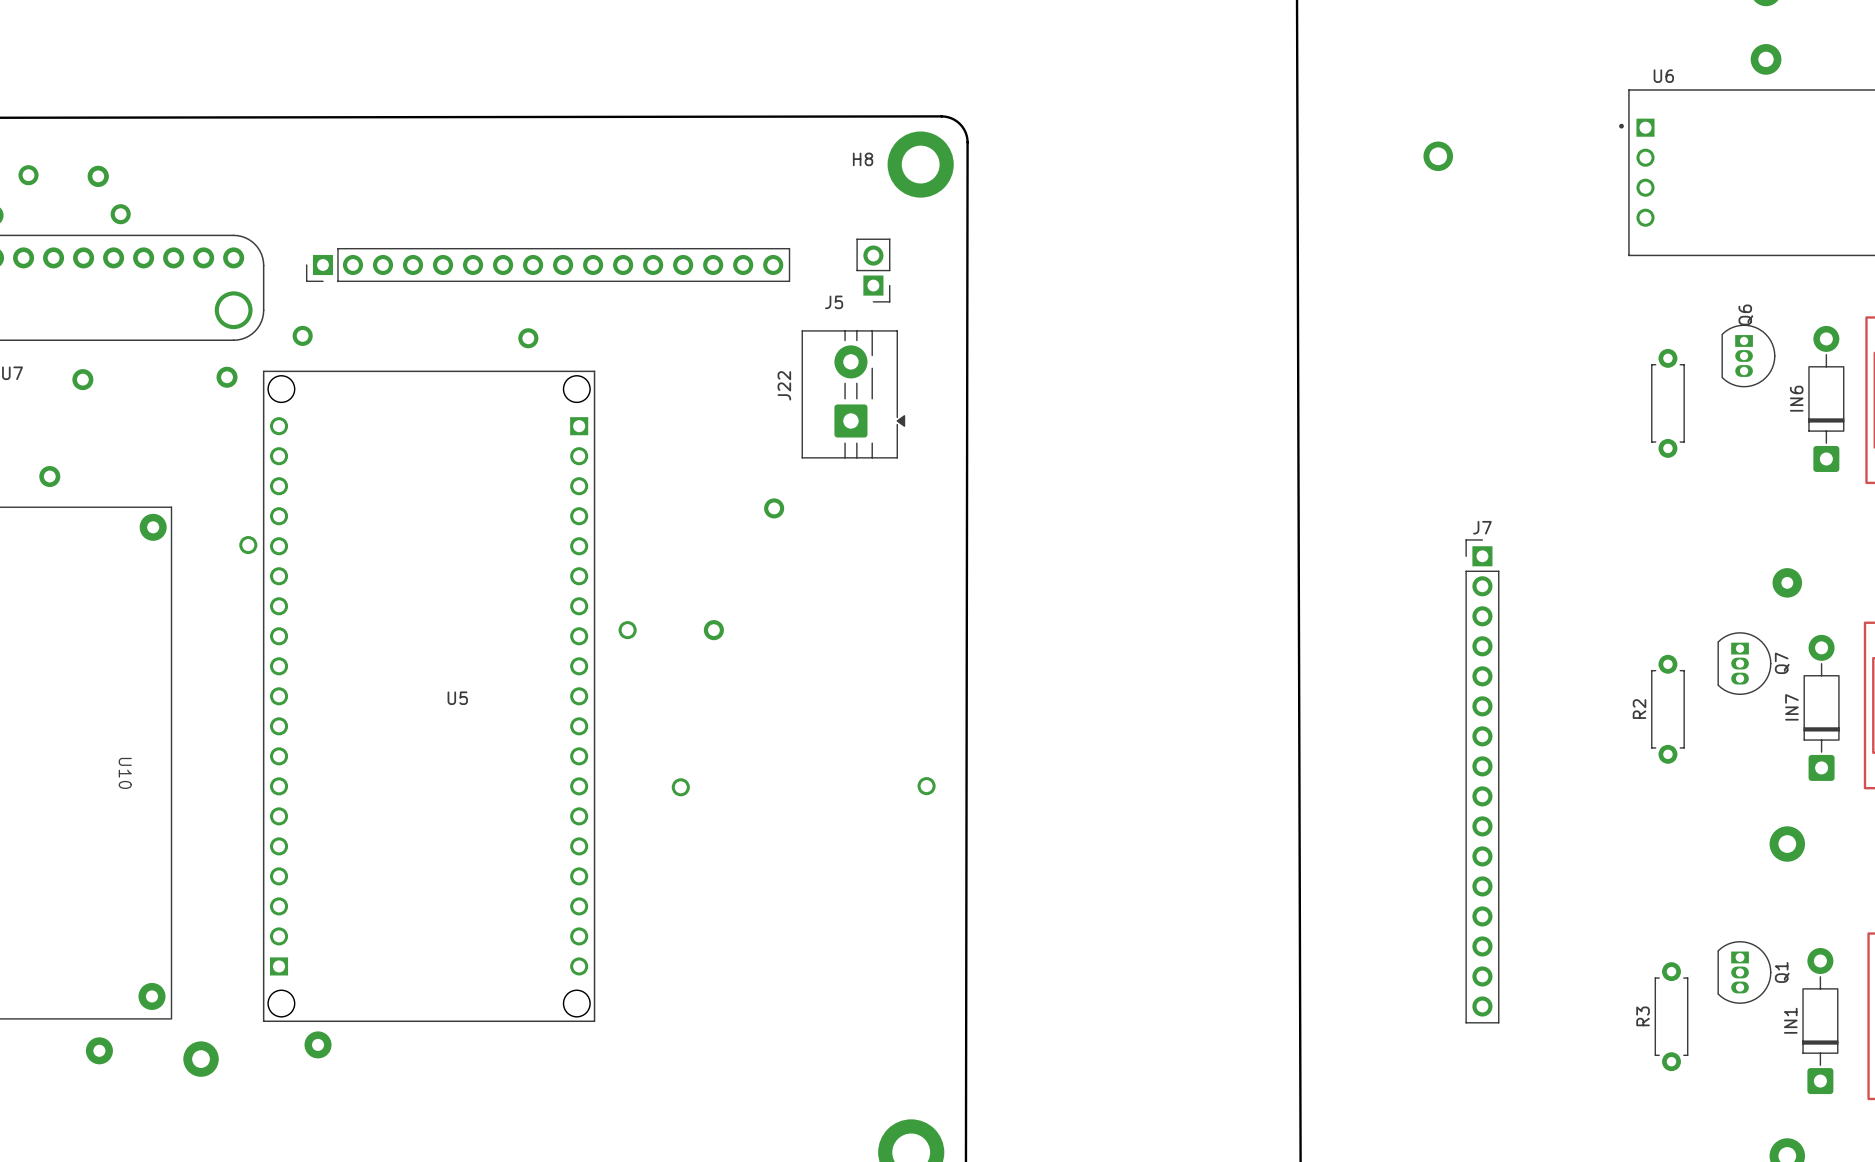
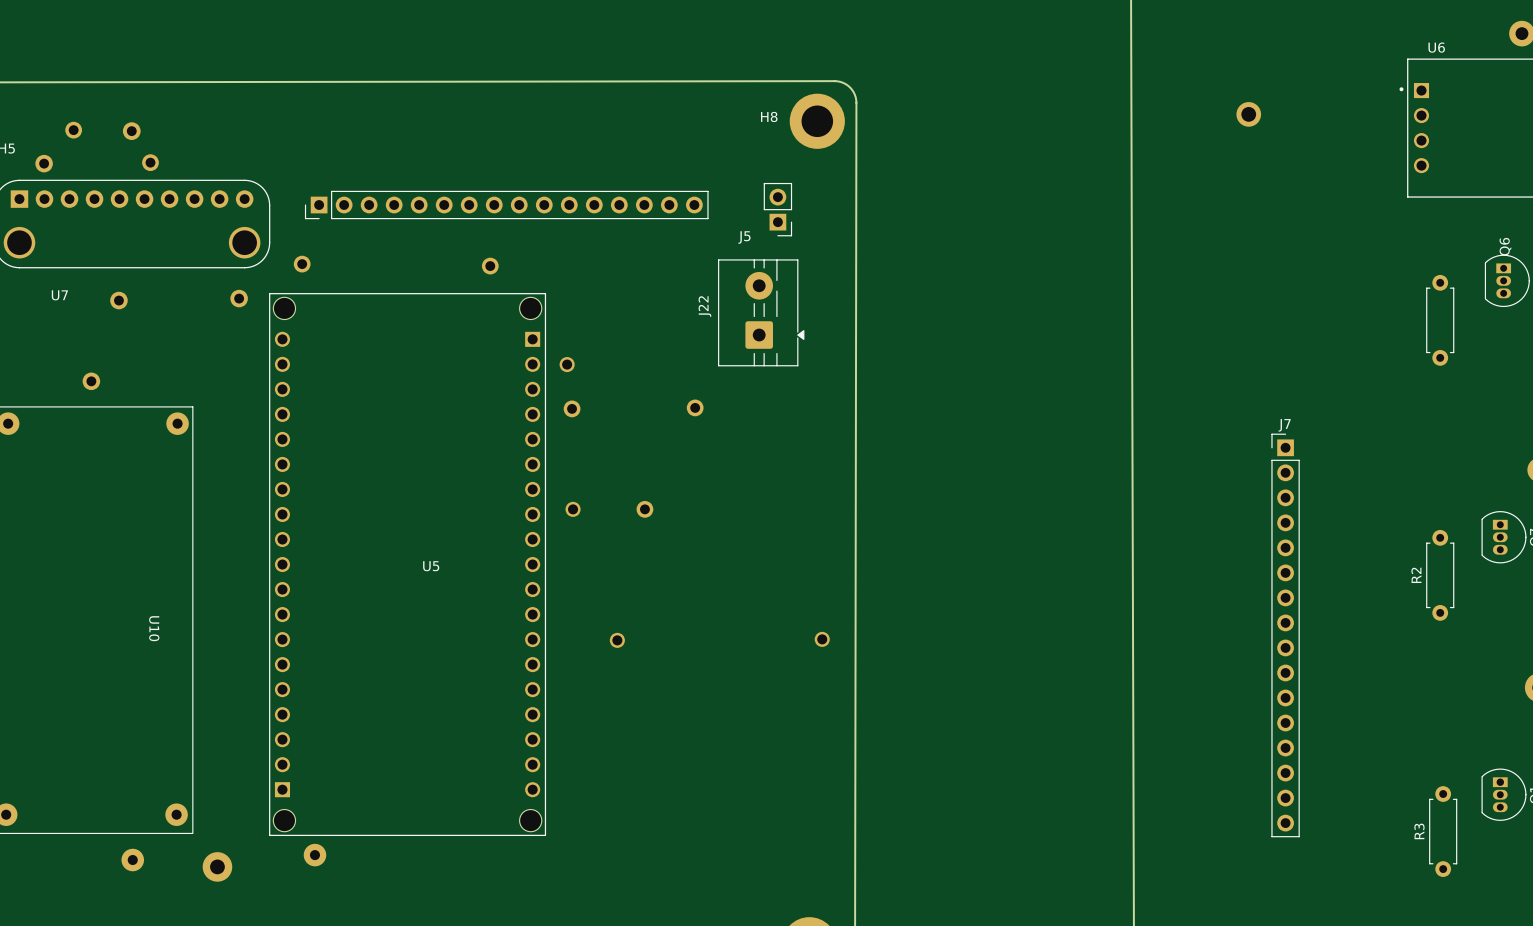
part: none -> (567, 364)
part: none -> (572, 408)
part: (248, 545) -> none

